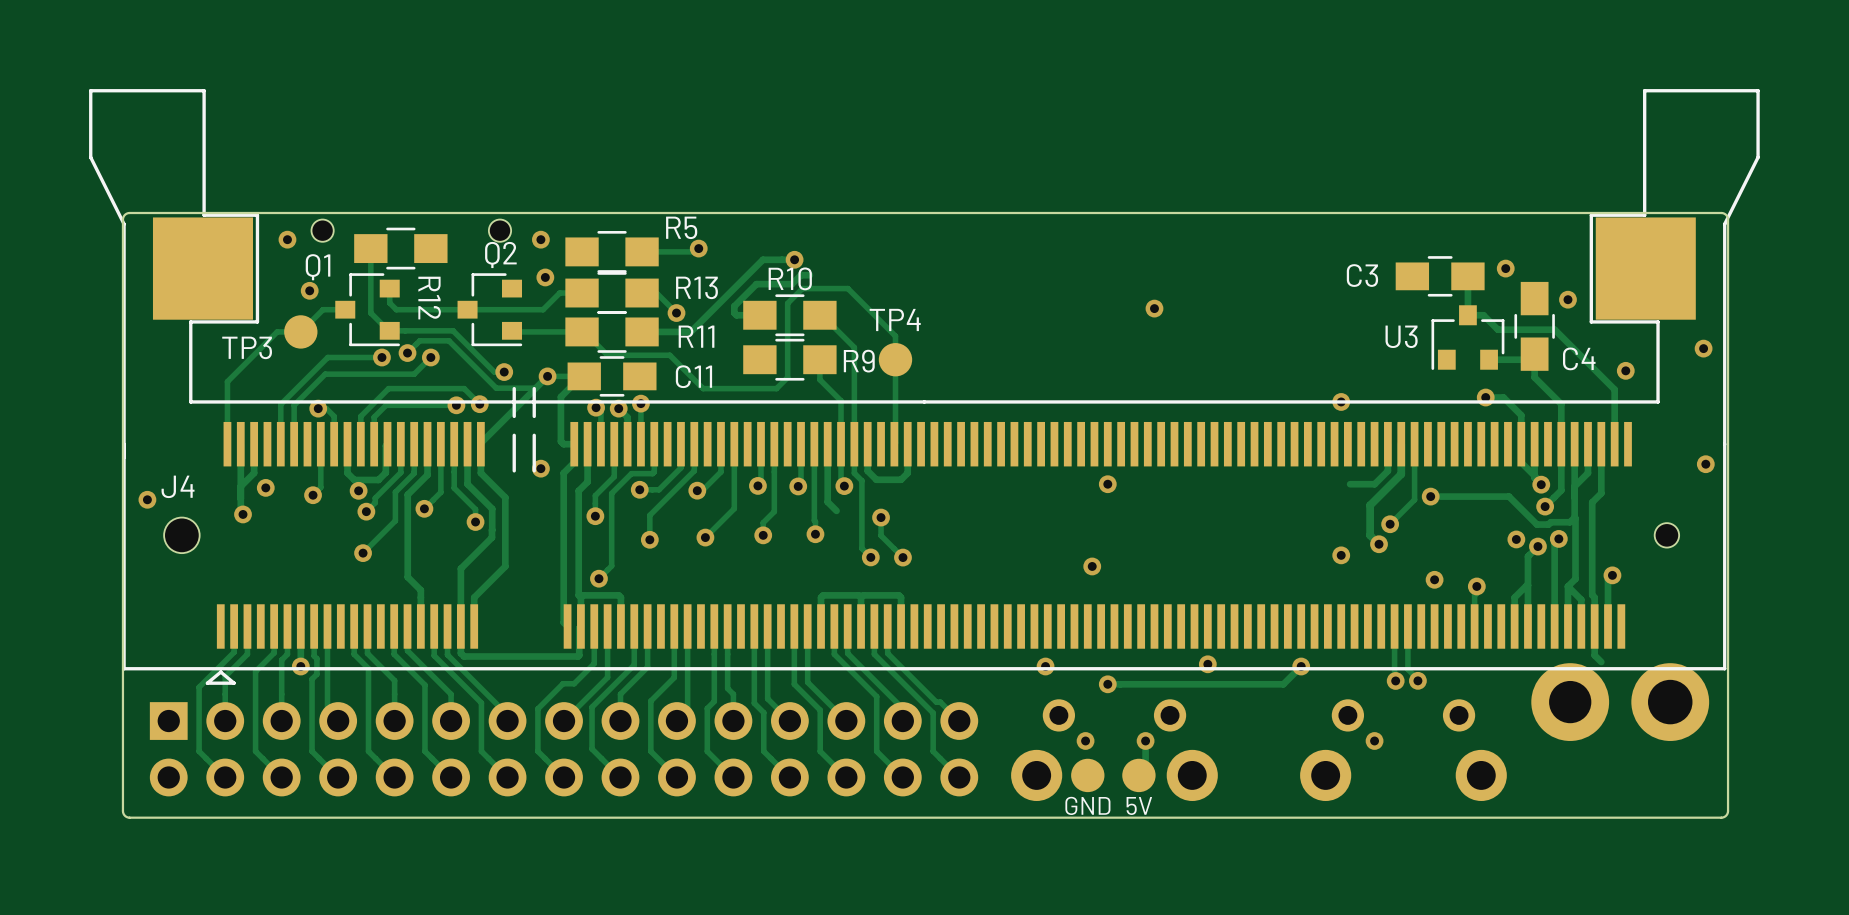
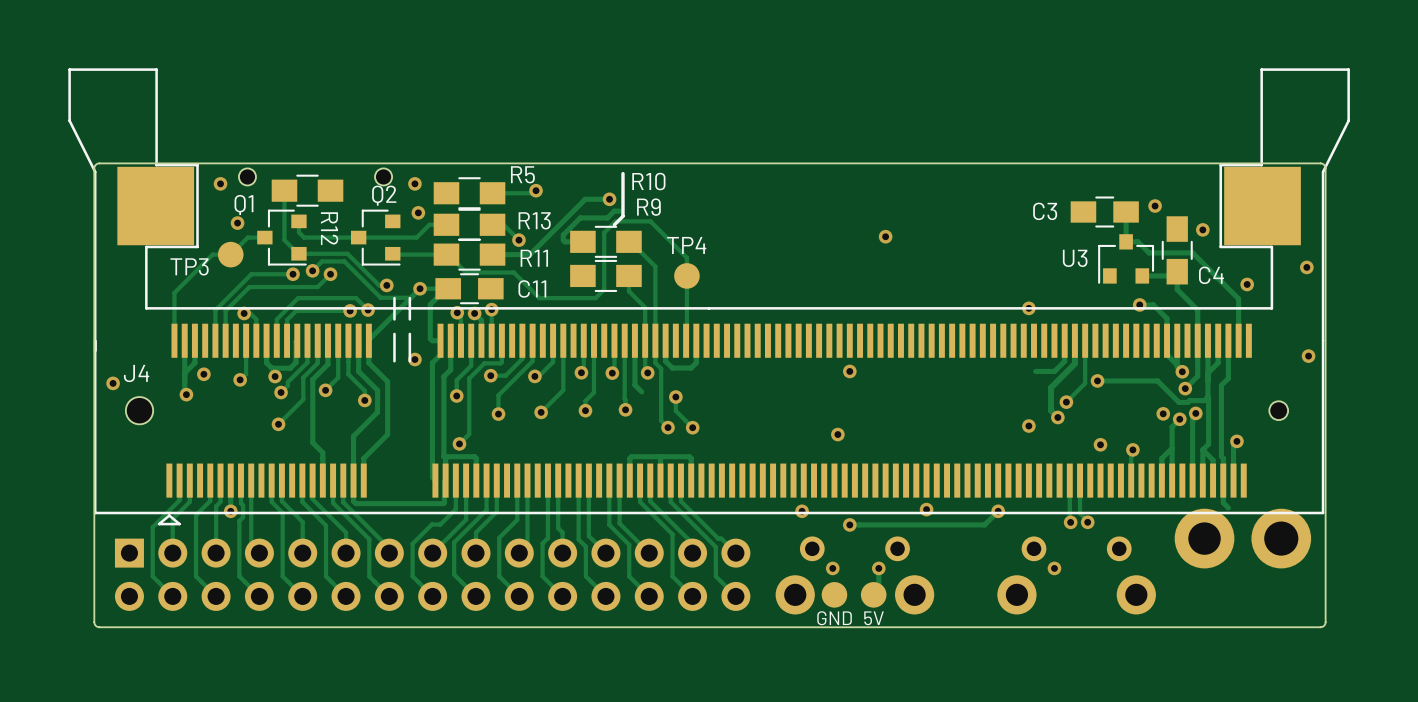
line: none -> (622, 173) (622, 216) (614, 224)
R10 name position: R10 (790, 278) -> R10 (648, 181)
R9 name position: R9 (859, 361) -> R9 (648, 207)

